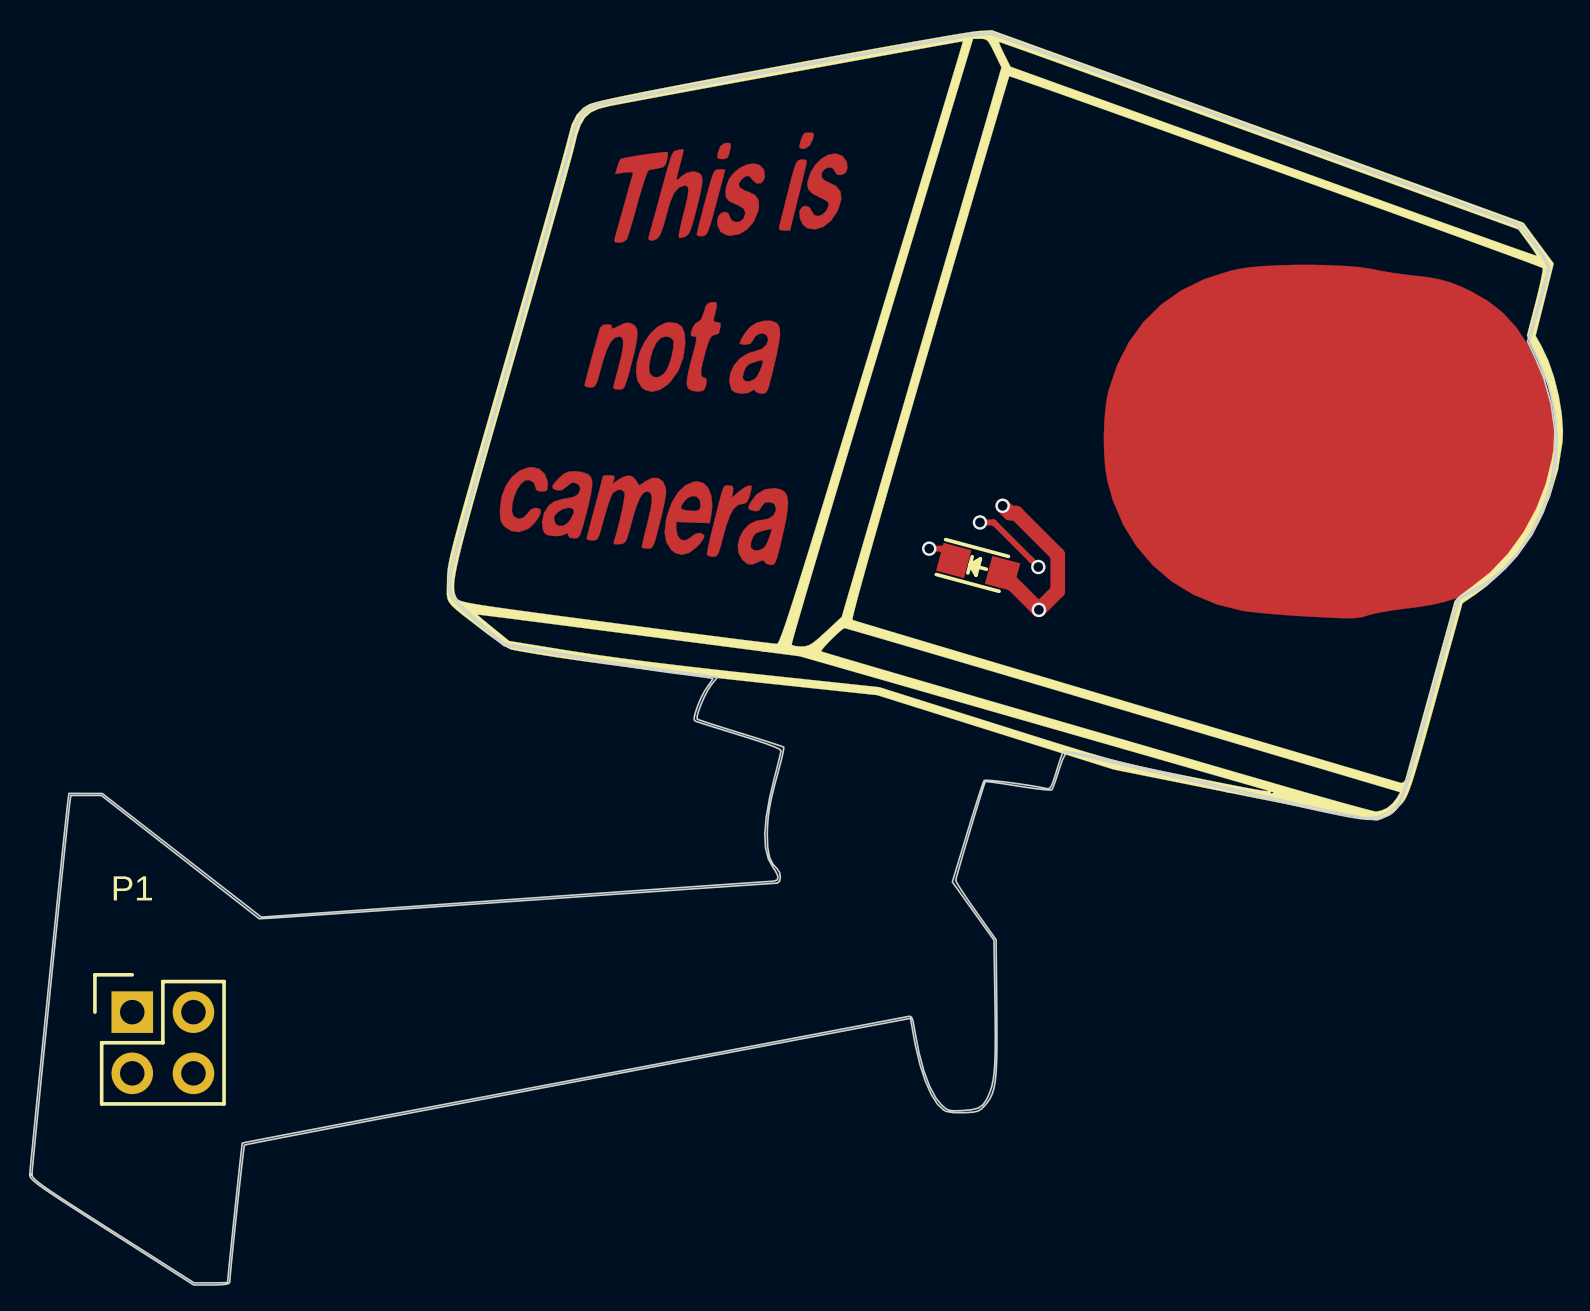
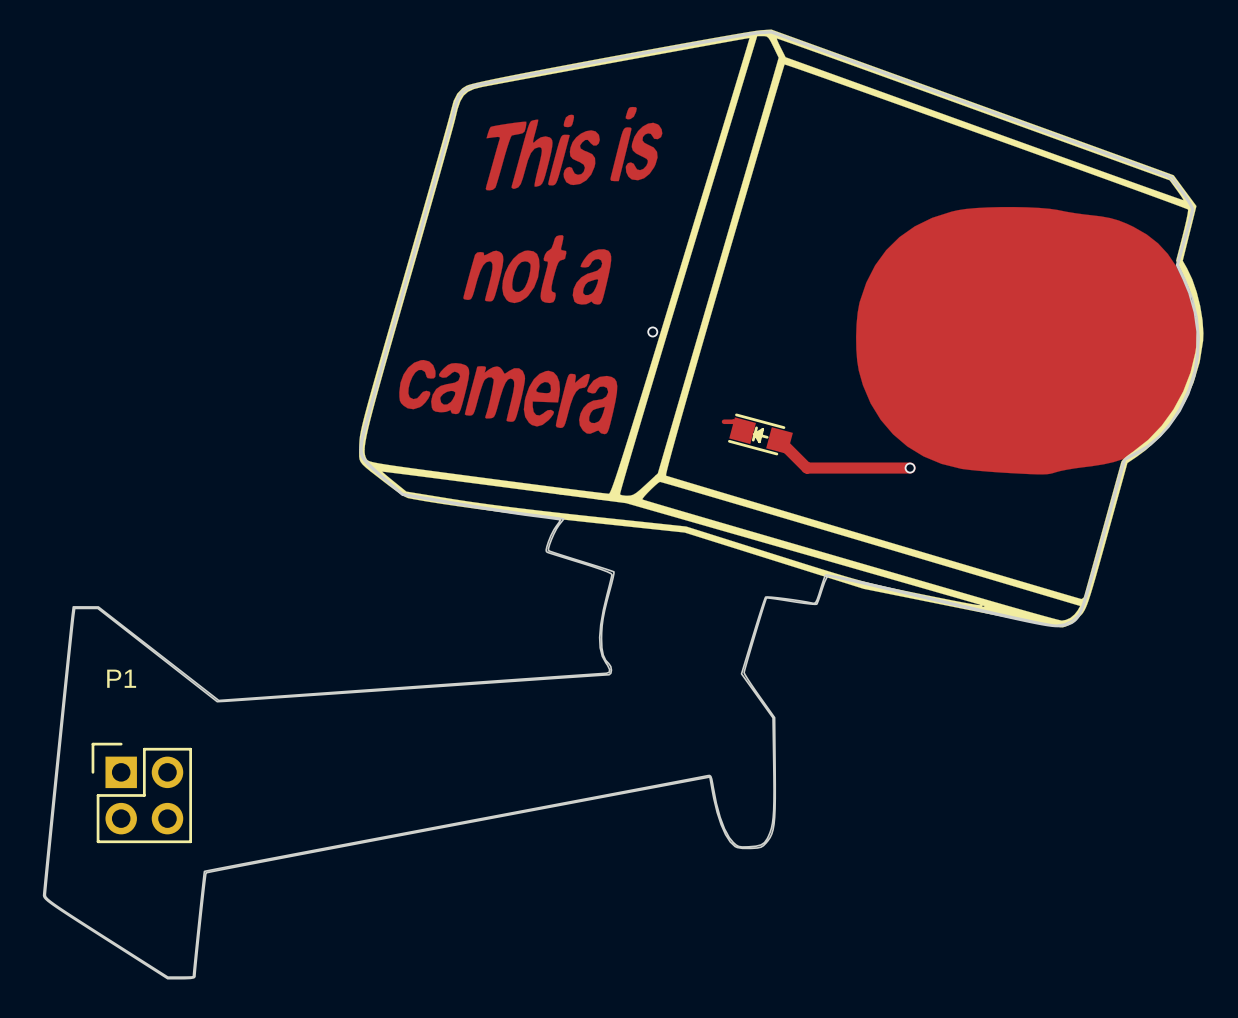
via: none -> (652, 331)
track: (1002, 505) (1009, 513) (1015, 513) (1057, 554) (1057, 591) (1038, 609) -> (910, 468) (806, 468)
via: (1002, 505) -> none
track: (979, 522) (993, 522) (1038, 567) -> none
via: (979, 522) -> none
via: (929, 548) -> none
via: (1038, 567) -> none
via: (1038, 609) -> none
via: none -> (910, 468)

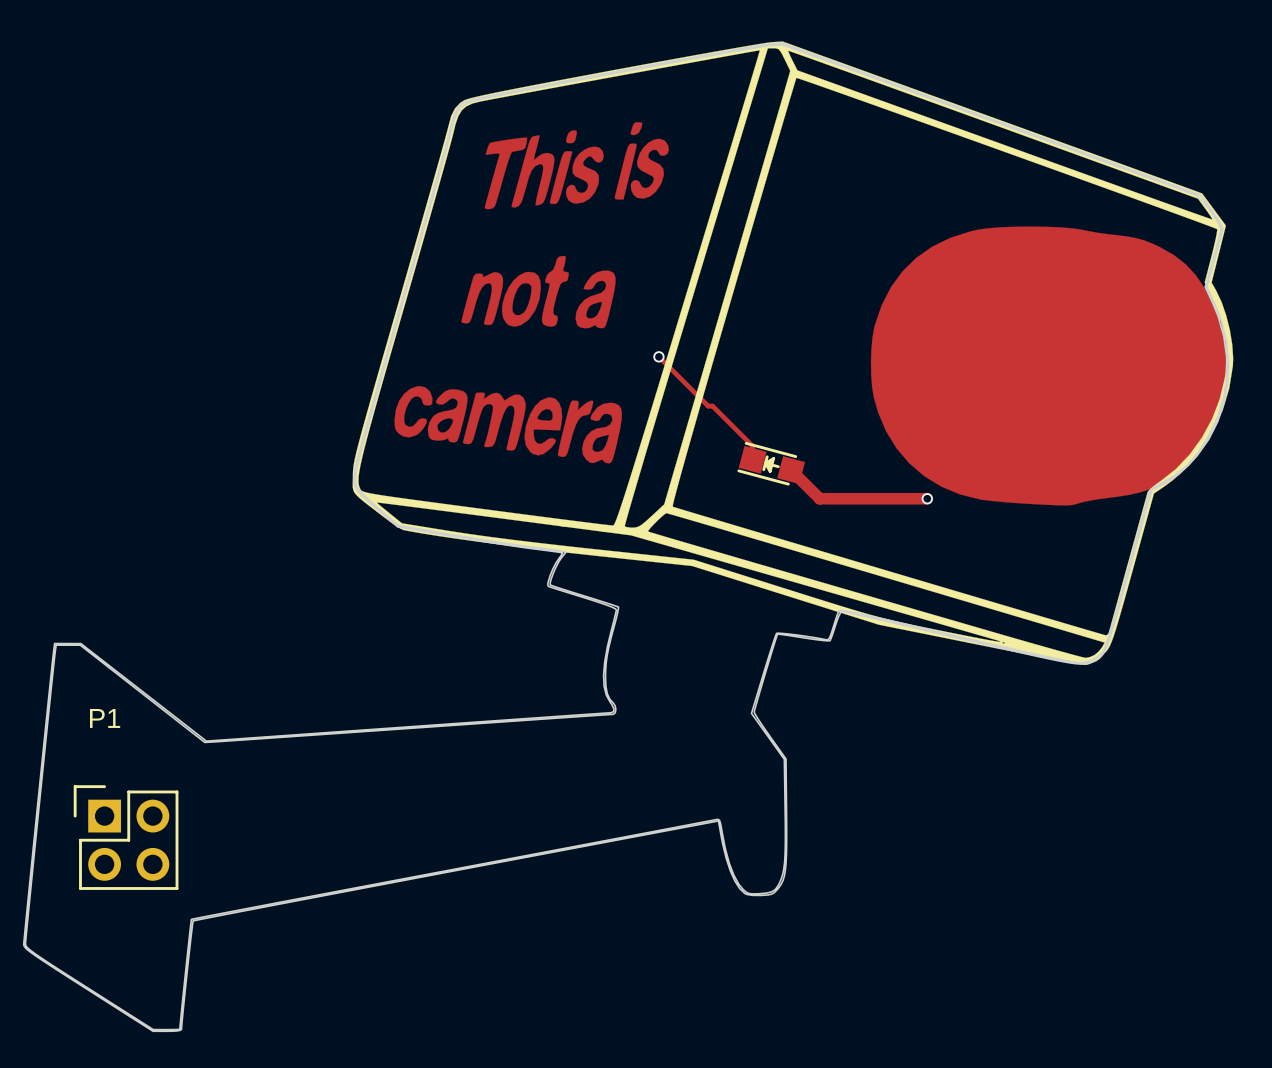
track: (724, 421) (733, 421) (742, 430) -> (658, 356) (708, 406) (712, 406) (752, 446) (752, 459)

